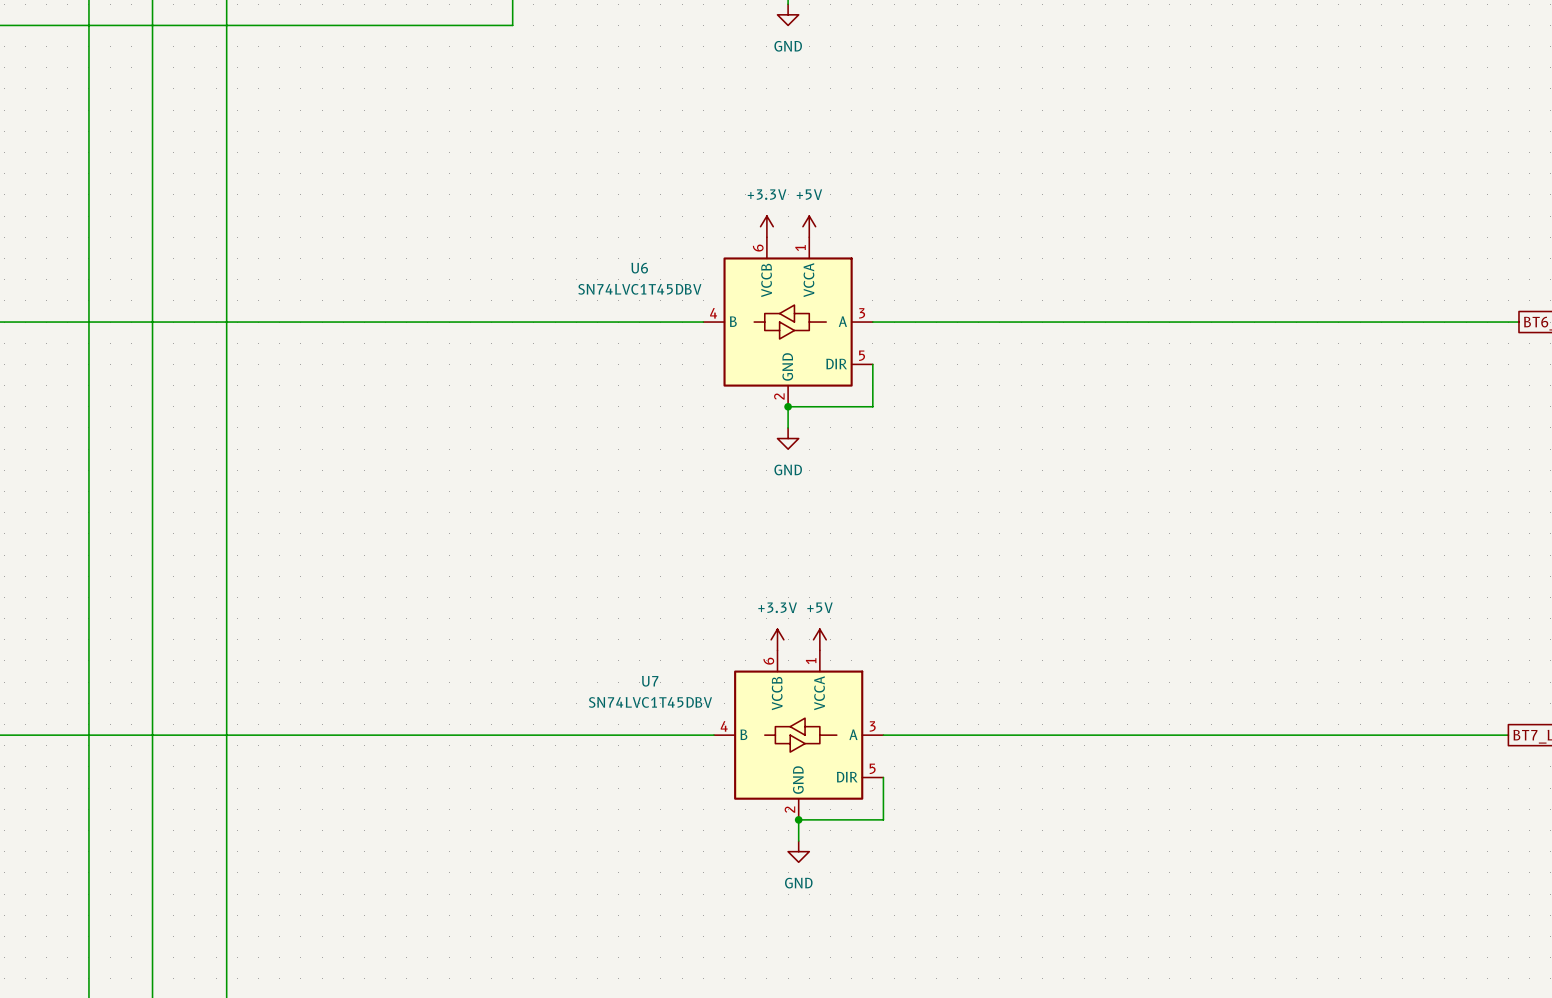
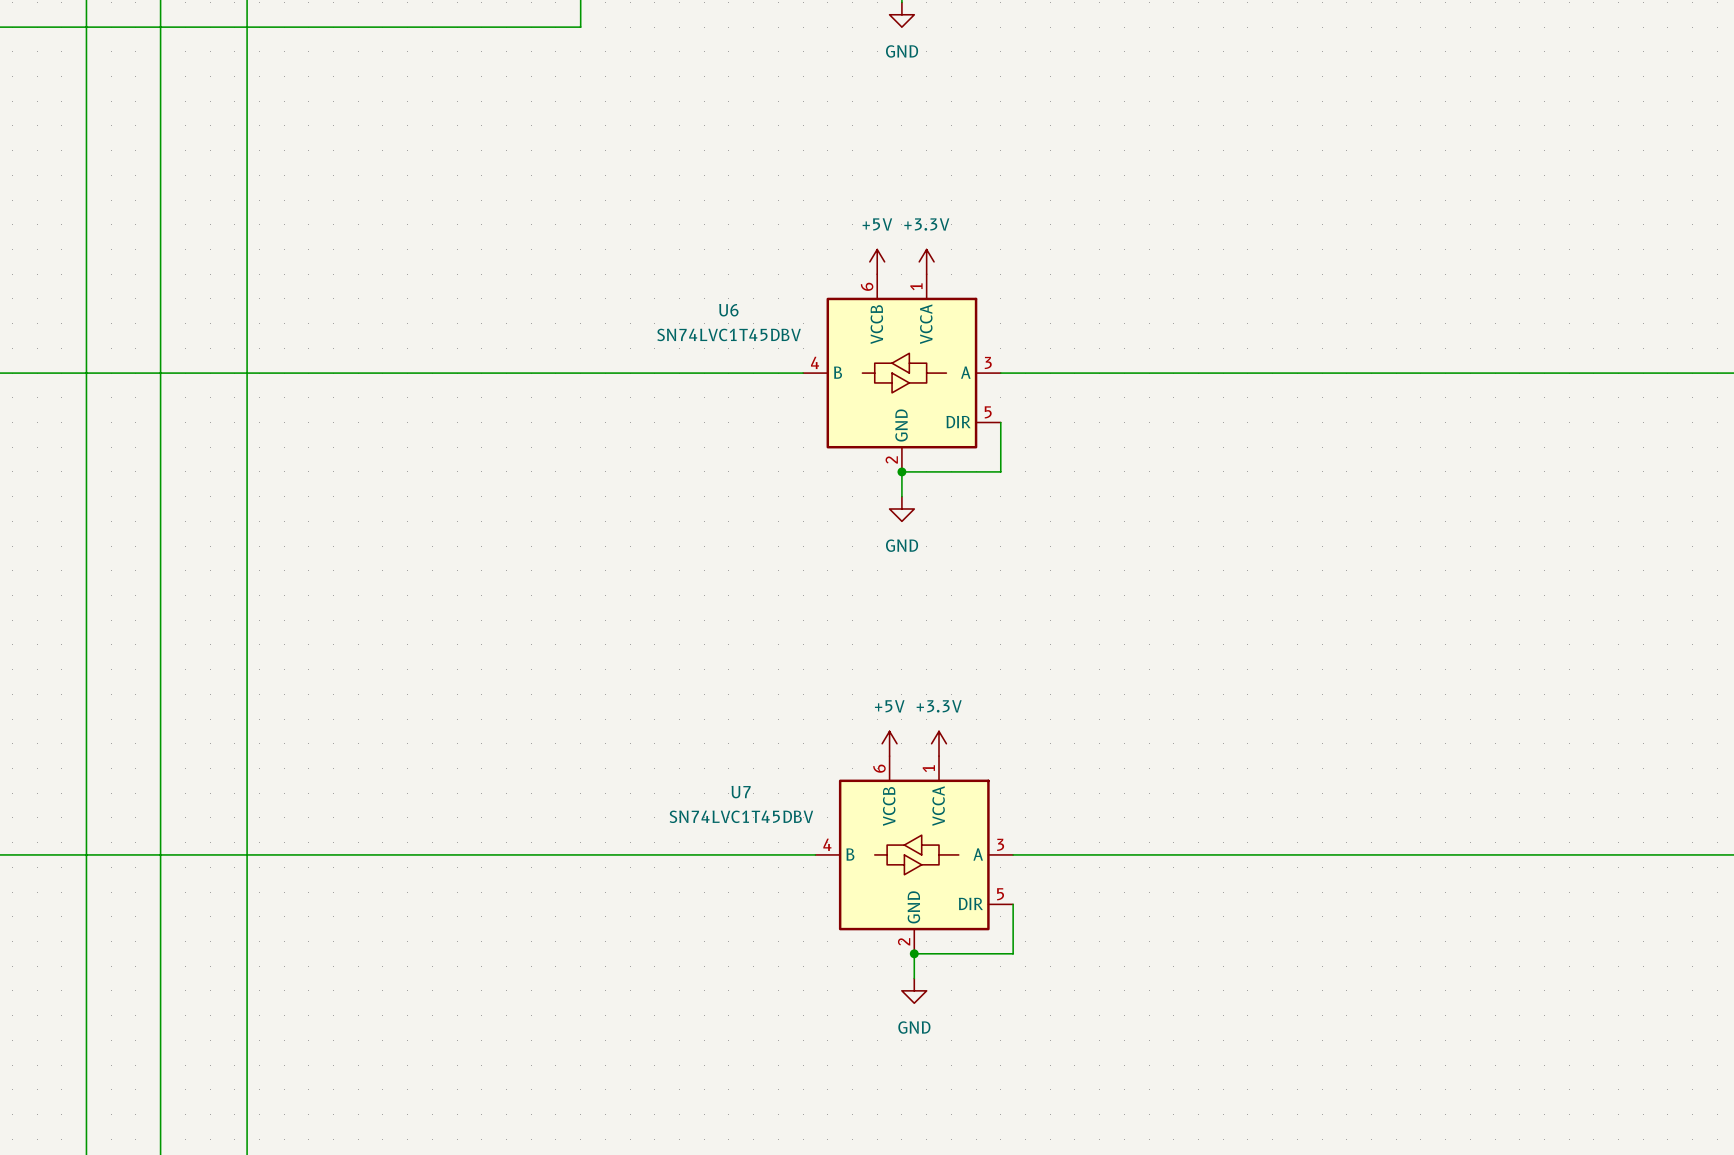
power symbol: +3.3V (766, 226) -> +5V (877, 261)
power symbol: +5V (809, 226) -> +3.3V (926, 261)
power symbol: +3.3V (777, 639) -> +5V (889, 743)
power symbol: +5V (819, 639) -> +3.3V (939, 743)

